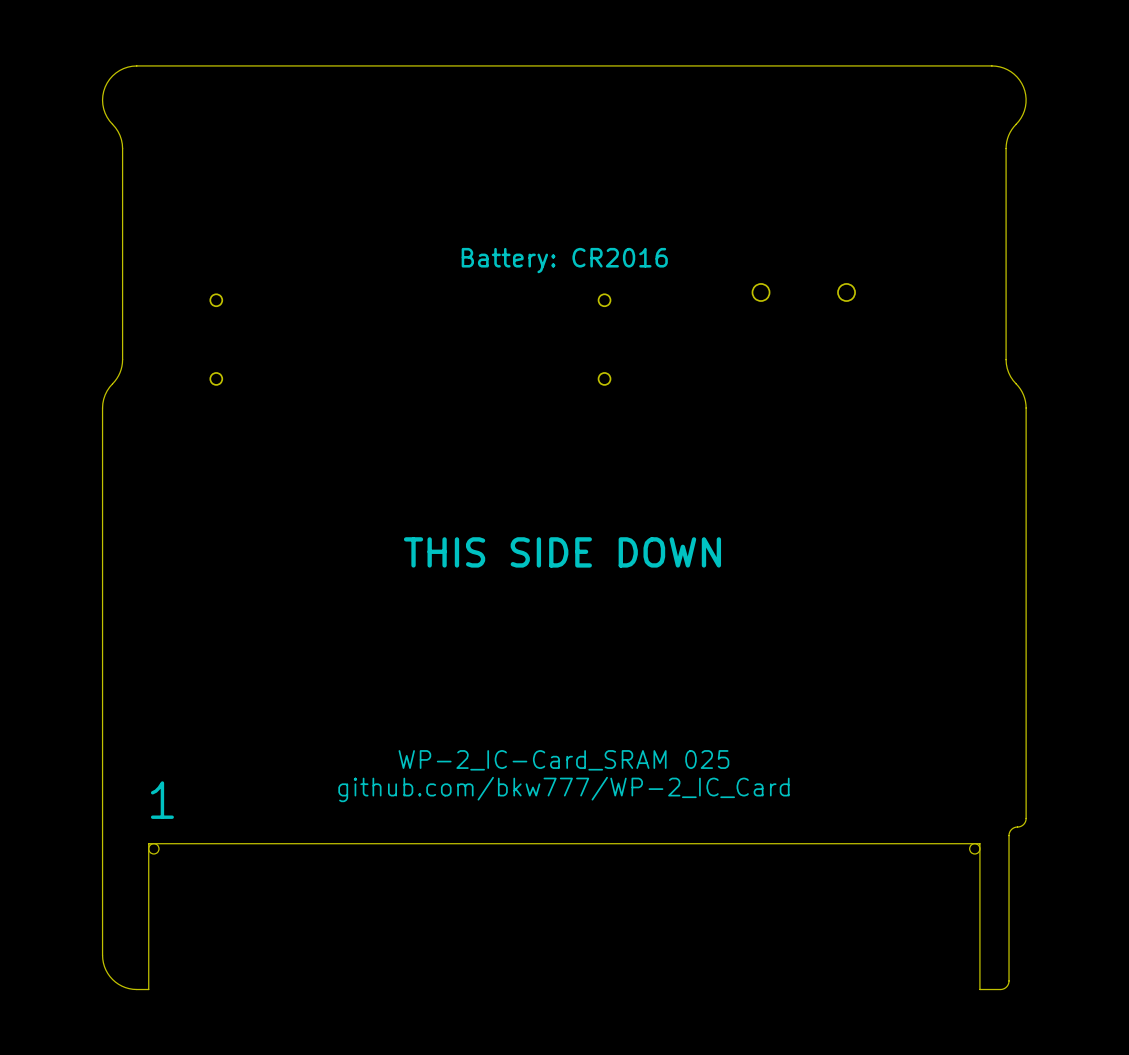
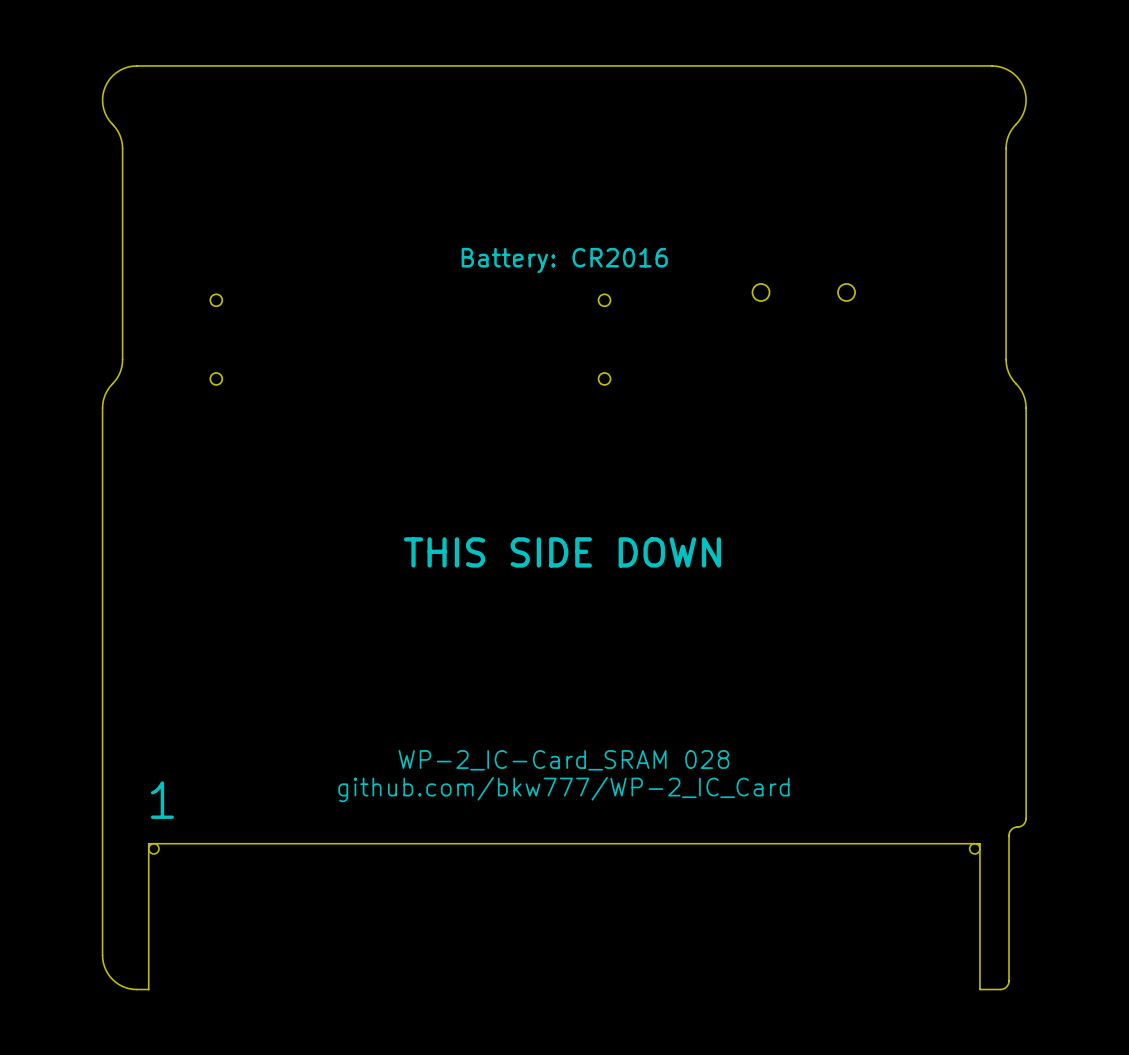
text: WP-2_IC-Card_SRAM 025 (563, 760) -> WP-2_IC-Card_SRAM 028 (563, 760)

